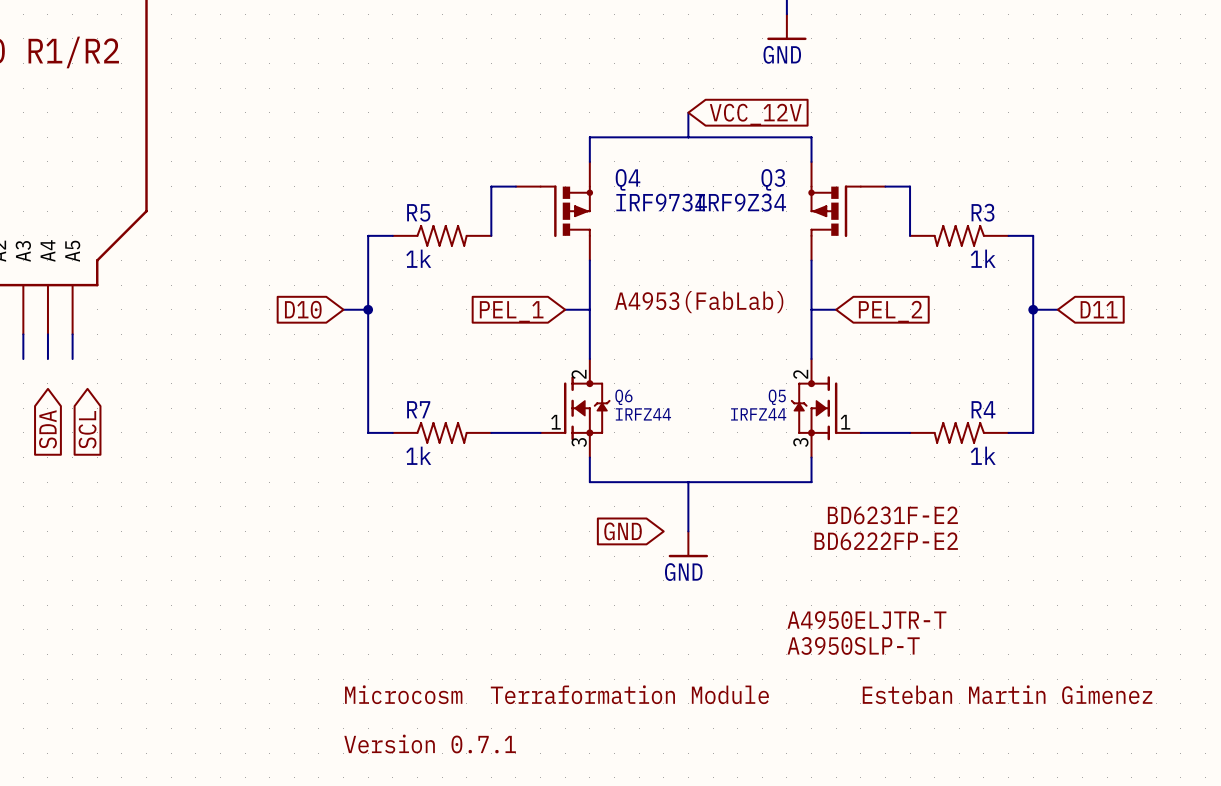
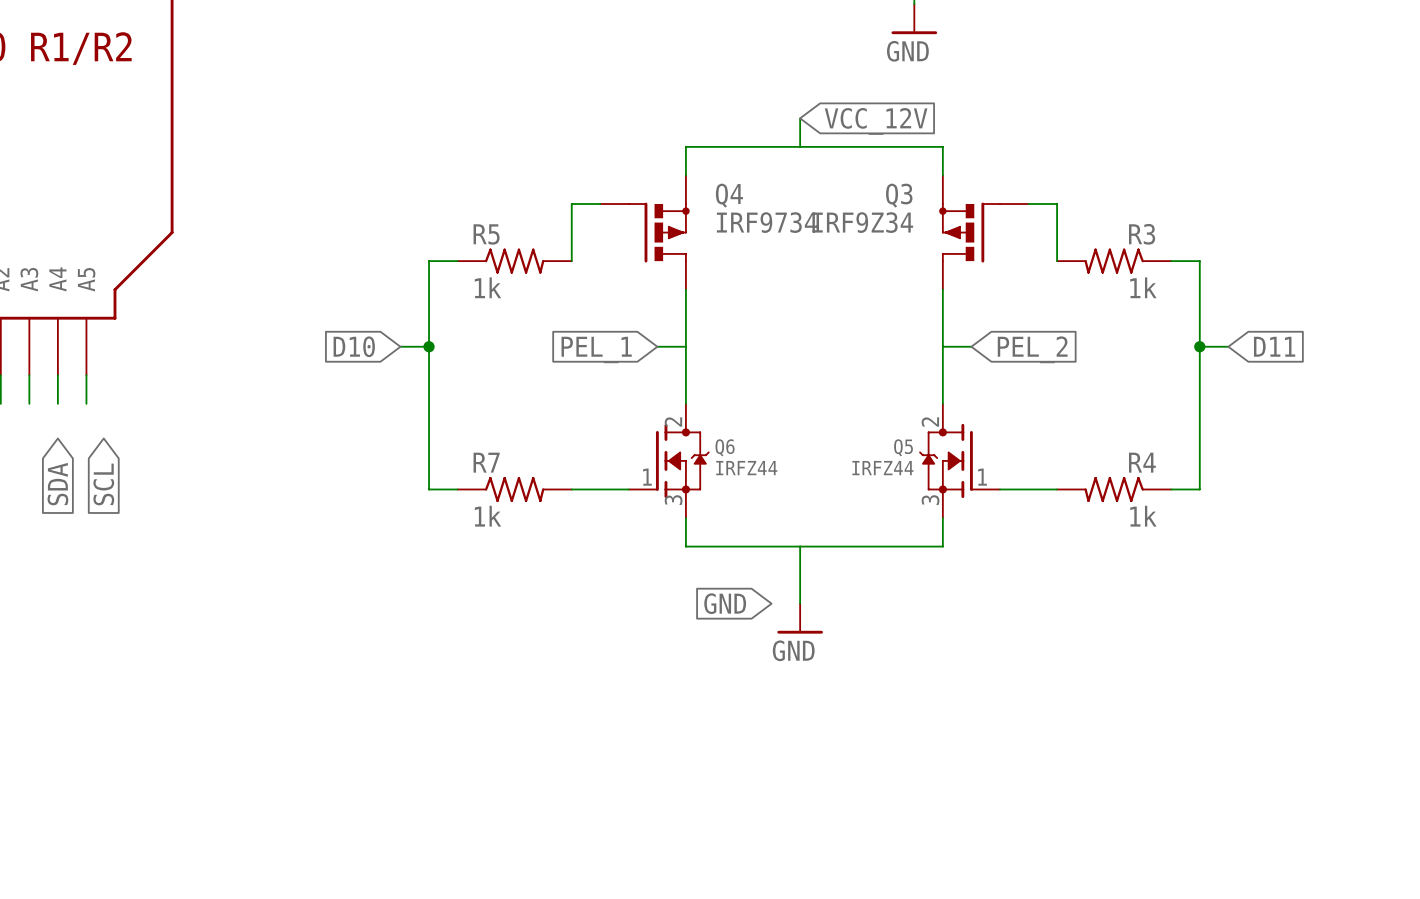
text: A4953(FabLab) (699, 302) -> none
text: BD6231F-E2 (892, 515) -> none
text: BD6222FP-E2 (886, 541) -> none
text: A4950ELJTR-T (866, 620) -> none
text: A3950SLP-T (853, 645) -> none
text: Microcosm Terraformation Module (556, 694) -> none
text: Esteban Martin Gimenez (1007, 694) -> none
text: Version 0.7.1 (430, 744) -> none

